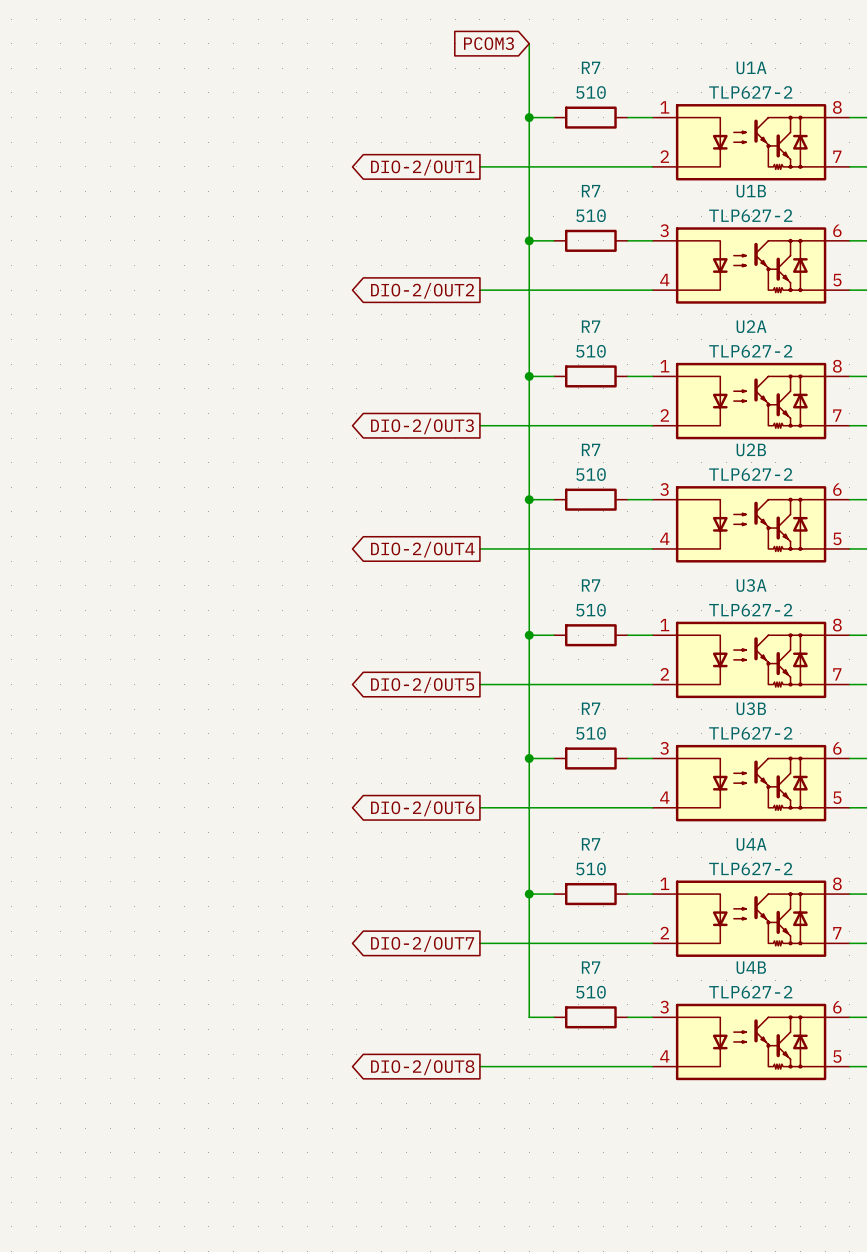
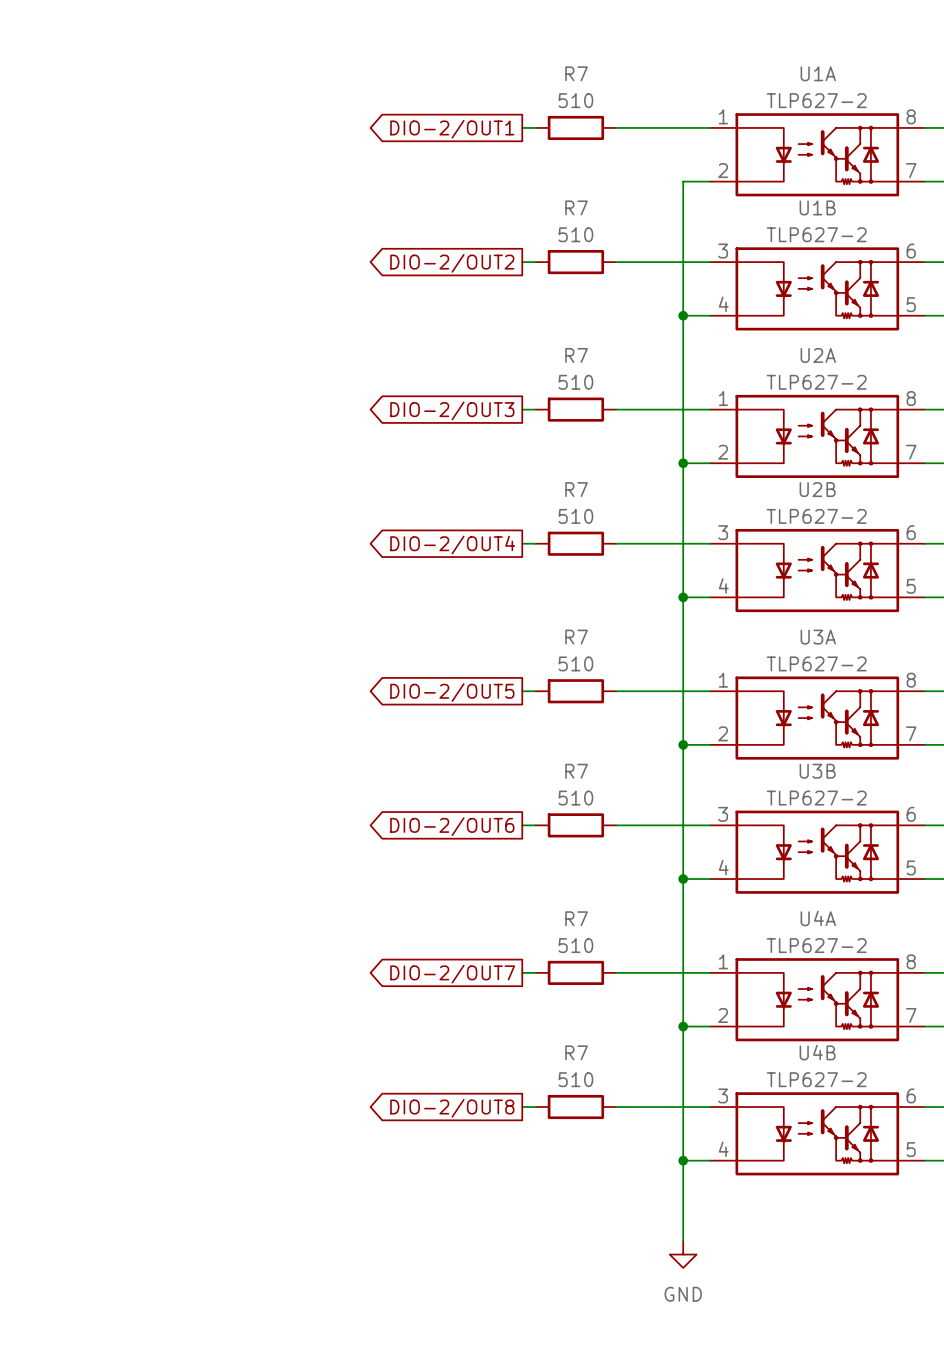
global label: PCOM3 (488, 43) -> none
wire: (529, 43) (529, 1017) (553, 1017) -> none
wire: none -> (522, 127) (535, 127)
wire: (529, 117) (553, 117) -> none
junction: (529, 117) -> none
wire: none -> (616, 127) (683, 127)
R7 position: (590, 117) -> (575, 127)
wire: (479, 166) (627, 166) -> (683, 1241) (683, 181)
global label position: DIO-2/OUT1 (422, 167) -> DIO-2/OUT1 (452, 129)
wire: none -> (522, 262) (535, 262)
wire: (529, 240) (553, 240) -> none
junction: (529, 240) -> none
wire: none -> (616, 262) (683, 262)
R7 position: (590, 240) -> (575, 262)
global label position: DIO-2/OUT2 (422, 290) -> DIO-2/OUT2 (452, 263)
wire: (479, 290) (627, 290) -> none
junction: none -> (683, 315)
wire: none -> (522, 409) (535, 409)
wire: (529, 376) (553, 376) -> none
junction: (529, 376) -> none
wire: none -> (616, 409) (683, 409)
R7 position: (590, 376) -> (575, 409)
wire: (479, 425) (627, 425) -> none
junction: none -> (683, 463)
global label position: DIO-2/OUT3 (422, 426) -> DIO-2/OUT3 (452, 410)
wire: none -> (522, 543) (535, 543)
wire: (529, 499) (553, 499) -> none
junction: (529, 499) -> none
wire: none -> (616, 543) (683, 543)
R7 position: (590, 499) -> (575, 543)
wire: (479, 548) (627, 548) -> none
junction: none -> (683, 597)
global label position: DIO-2/OUT4 (422, 549) -> DIO-2/OUT4 (452, 545)
wire: none -> (522, 691) (535, 691)
wire: (529, 635) (553, 635) -> none
junction: (529, 635) -> none
wire: none -> (616, 691) (683, 691)
R7 position: (590, 635) -> (575, 691)
wire: (479, 684) (627, 684) -> none
junction: none -> (683, 744)
global label position: DIO-2/OUT5 (422, 685) -> DIO-2/OUT5 (452, 692)
wire: none -> (522, 825) (535, 825)
wire: (529, 758) (553, 758) -> none
junction: (529, 758) -> none
wire: none -> (616, 825) (683, 825)
R7 position: (590, 758) -> (575, 825)
wire: (479, 807) (627, 807) -> none
junction: none -> (683, 879)
global label position: DIO-2/OUT6 (422, 808) -> DIO-2/OUT6 (452, 826)
wire: none -> (522, 972) (535, 972)
wire: (529, 894) (553, 894) -> none
junction: (529, 894) -> none
wire: none -> (616, 972) (683, 972)
R7 position: (590, 894) -> (575, 972)
wire: (479, 943) (627, 943) -> none
junction: none -> (683, 1026)
global label position: DIO-2/OUT7 (422, 944) -> DIO-2/OUT7 (452, 974)
wire: none -> (522, 1107) (535, 1107)
wire: none -> (616, 1107) (683, 1107)
R7 position: (590, 1017) -> (575, 1107)
wire: (479, 1066) (627, 1066) -> none
junction: none -> (683, 1160)
global label position: DIO-2/OUT8 (422, 1067) -> DIO-2/OUT8 (452, 1108)
power symbol: none -> GND (683, 1254)

